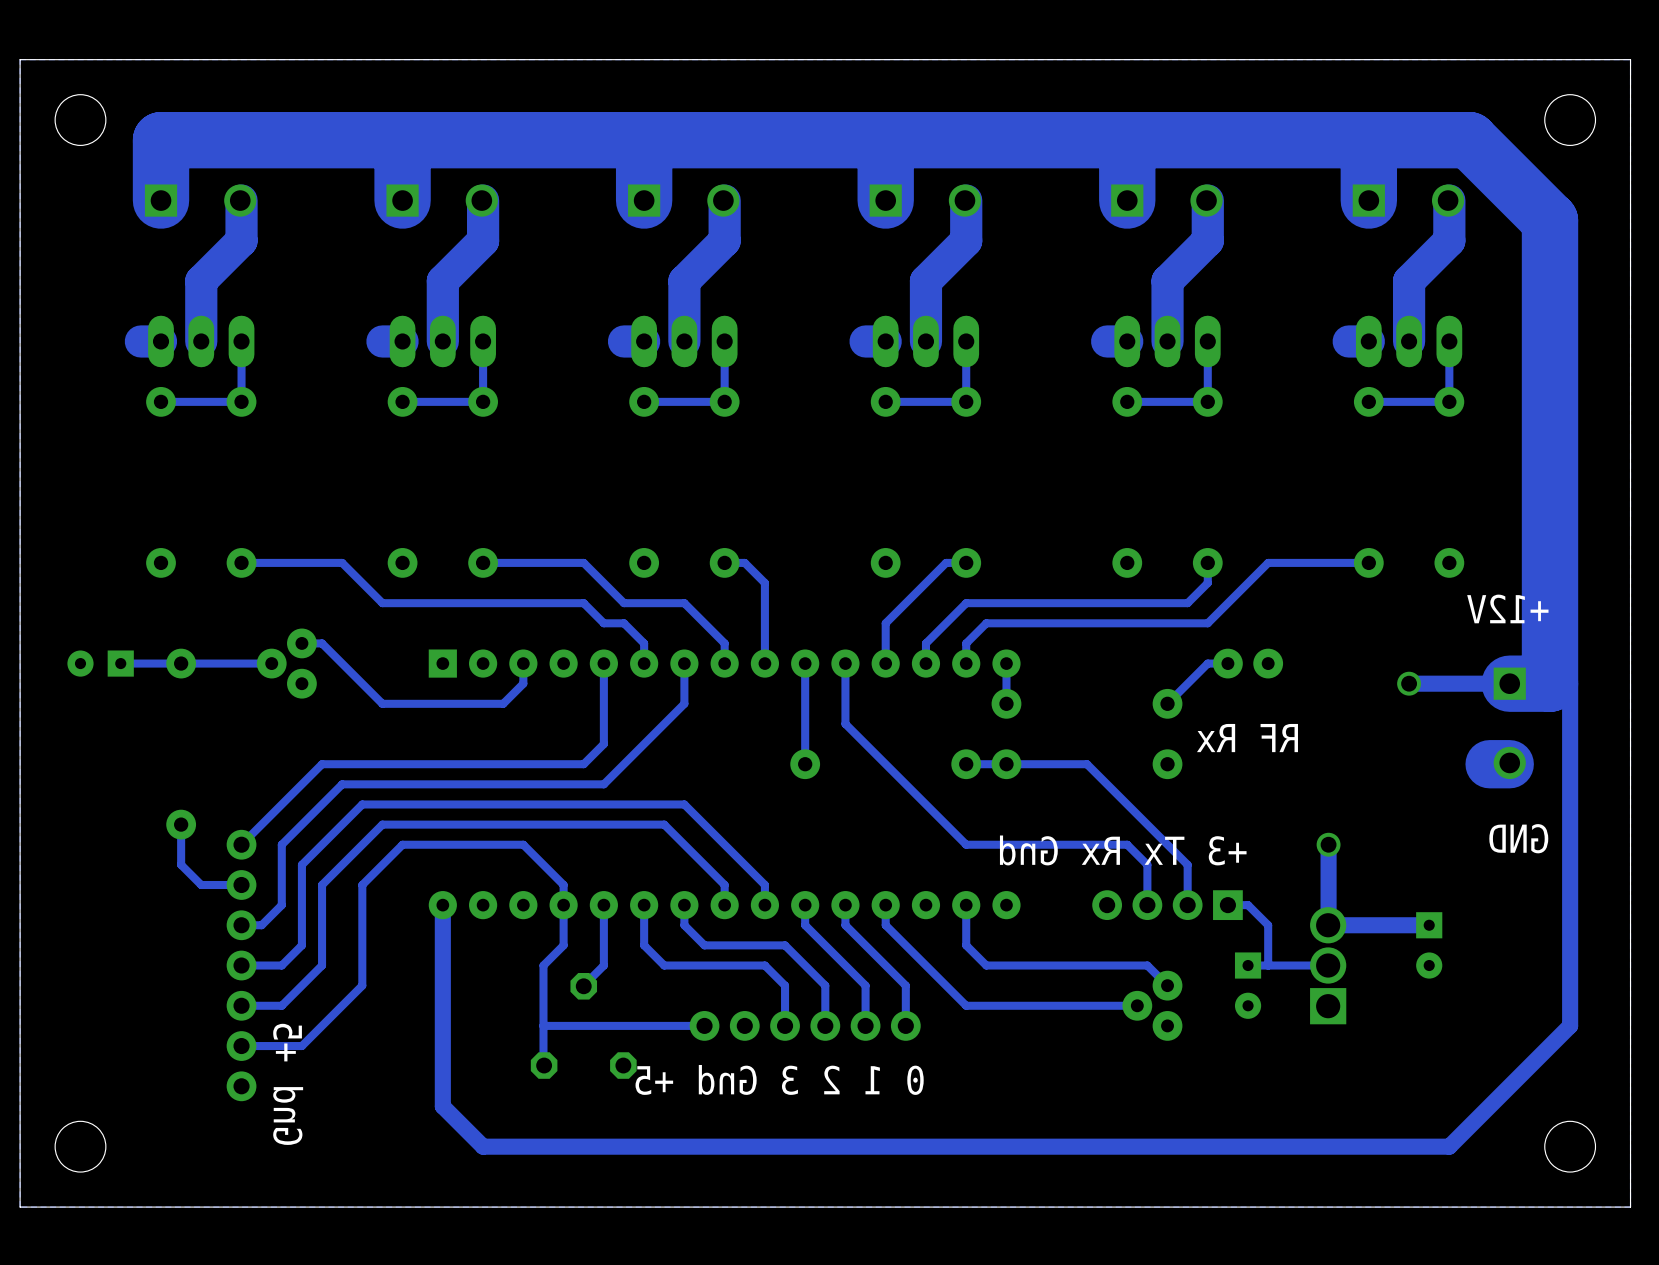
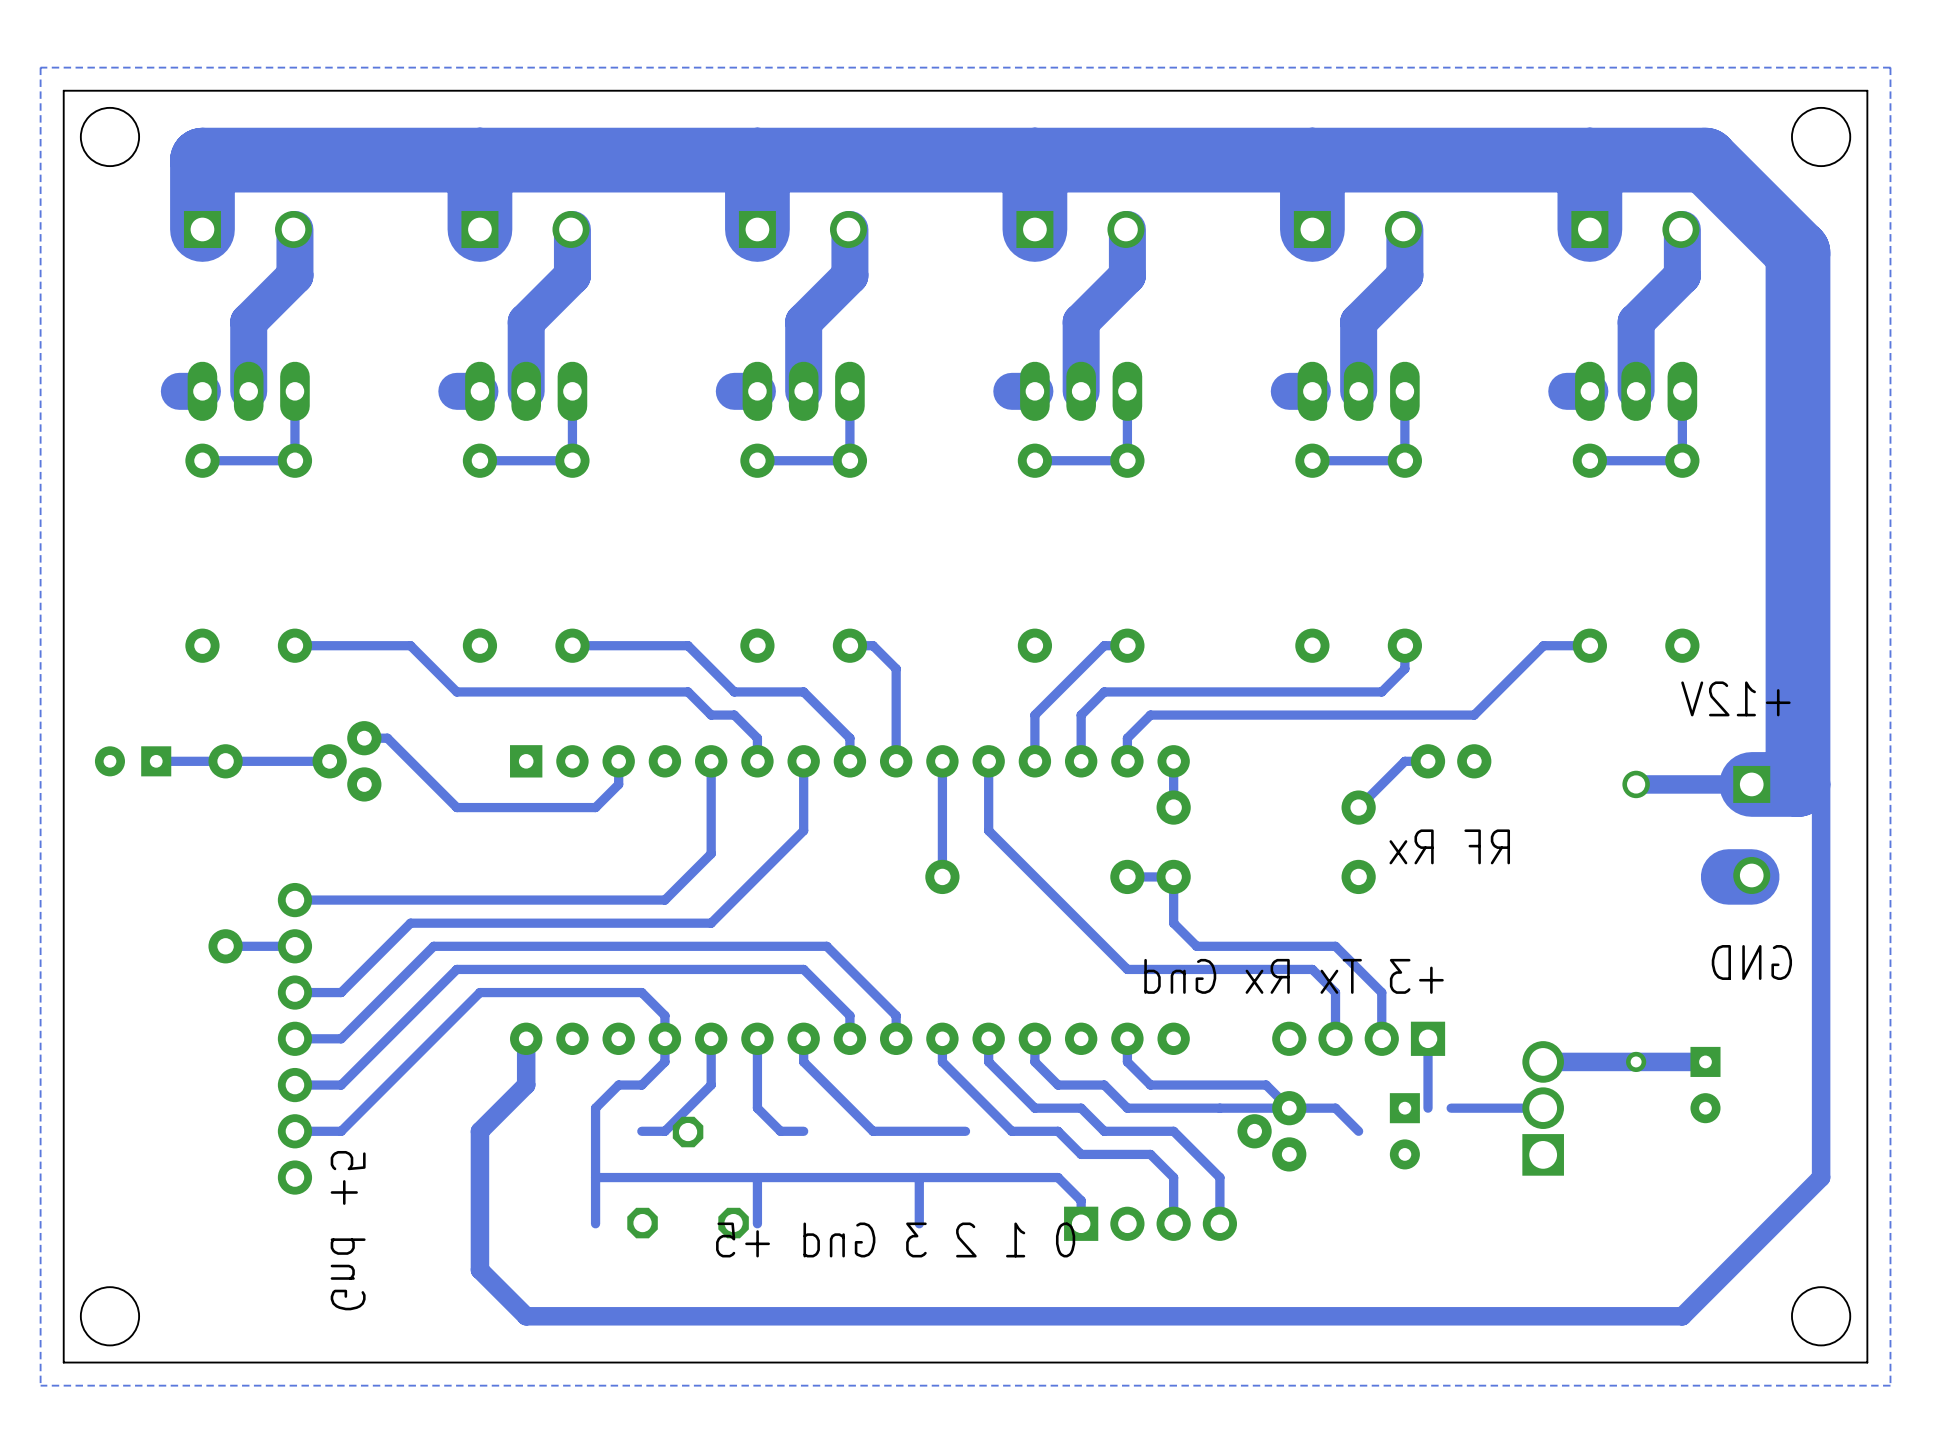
board edge: (1630, 59) (20, 59) (20, 1207) (1630, 1207) (1630, 59) -> (1867, 90) (1867, 1362) (63, 1362) (63, 90) (1867, 90)
track: (1328, 562) (1268, 562) (1207, 623) -> (1543, 645) (1474, 715) (1404, 715)
track: (966, 603) (925, 643) -> (1127, 691) (1104, 691) (1081, 715) (1081, 738)
track: (684, 703) (603, 784) (563, 784) -> (803, 807) (803, 830) (711, 923)
track: (583, 764) (322, 764) (241, 844) -> (688, 876) (664, 900)
track: (1006, 764) (1087, 764) (1147, 824) -> (1173, 876) (1173, 923) (1196, 946) (1335, 946)
track: (342, 784) (281, 844) (281, 905) (261, 925) (241, 925) -> (410, 900) (294, 900)
track: (362, 804) (301, 864) (301, 945) (281, 965) (241, 965) -> (433, 923) (410, 923) (341, 992) (294, 992)
track: (603, 804) (684, 804) (704, 824) -> none
track: (181, 824) (181, 864) (201, 884) (241, 884) -> (225, 946) (294, 946)
track: (382, 824) (322, 884) (322, 965) (281, 1005) (241, 1005) -> (456, 946) (433, 946) (341, 1038) (294, 1038)
track: (664, 824) (684, 844) -> (780, 946) (826, 946)
track: (402, 844) (362, 884) (362, 985) (301, 1046) (241, 1046) -> (479, 969) (456, 969) (341, 1085) (294, 1085)
track: (523, 844) (543, 864) -> (618, 969) (803, 969)
track: (1328, 844) (1328, 925) -> none
via: (1328, 844) -> none
track: none -> (641, 992) (479, 992) (341, 1131) (294, 1131)
track: (1227, 905) (1248, 905) (1268, 925) (1268, 965) -> (1428, 1038) (1428, 1108)
track: (563, 925) (563, 945) (543, 965) (543, 1066) -> (664, 1061) (641, 1085) (618, 1085) (595, 1108) (595, 1223)
track: (966, 925) (966, 945) (986, 965) -> (1058, 1085) (1104, 1085) (1127, 1108) (1150, 1108)
track: none -> (1127, 1061) (1150, 1085) (1266, 1085) (1289, 1108)
via: none -> (1636, 1061)
track: none -> (1705, 1061) (1659, 1061)
track: (442, 945) (442, 1106) (483, 1146) -> (526, 1085) (479, 1131) (479, 1270) (526, 1316) (572, 1316)
track: (603, 945) (603, 965) (583, 985) -> (711, 1085) (664, 1131) (641, 1131)
track: (644, 945) (664, 965) (764, 965) (785, 985) (785, 1025) -> (757, 1085) (757, 1108) (780, 1131) (803, 1131)
track: (704, 945) (785, 945) (825, 985) (825, 1025) -> (826, 1085) (873, 1131) (965, 1131)
track: (905, 945) (925, 965) -> (1034, 1108) (1081, 1108)
part position: (1429, 945) -> (1705, 1085)
part position: (241, 965) -> (294, 1038)
track: (885, 965) (905, 985) (905, 1025) -> none
track: (865, 985) (865, 1025) -> (919, 1177) (919, 1223)
track: (946, 985) (966, 1005) -> (1011, 1131) (1058, 1131) (1081, 1154) (1127, 1154)
track: none -> (1104, 1131) (1173, 1131) (1219, 1177) (1219, 1223)
part position: (1248, 985) -> (1404, 1131)
track: (1147, 1005) (986, 1005) -> (1173, 1223) (1173, 1177) (1150, 1154)
part position: (1152, 1005) -> (1271, 1131)
track: none -> (641, 1177) (595, 1177)
track: none -> (757, 1177) (757, 1223)
track: none -> (826, 1177) (1058, 1177) (1081, 1200) (1081, 1223)
part: (805, 1025) -> none
part: none -> (1150, 1223)

